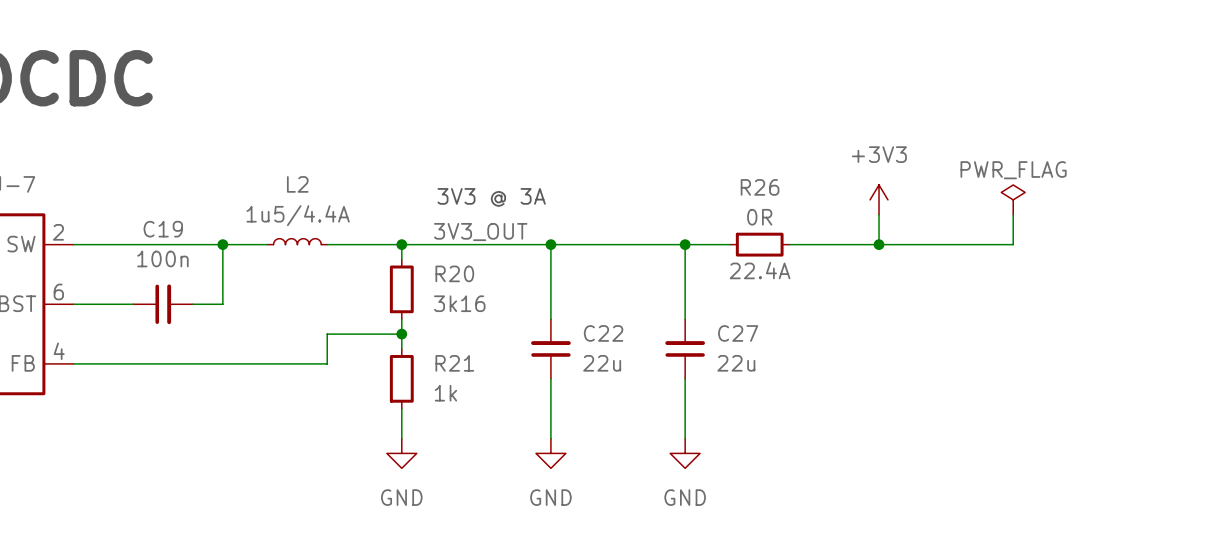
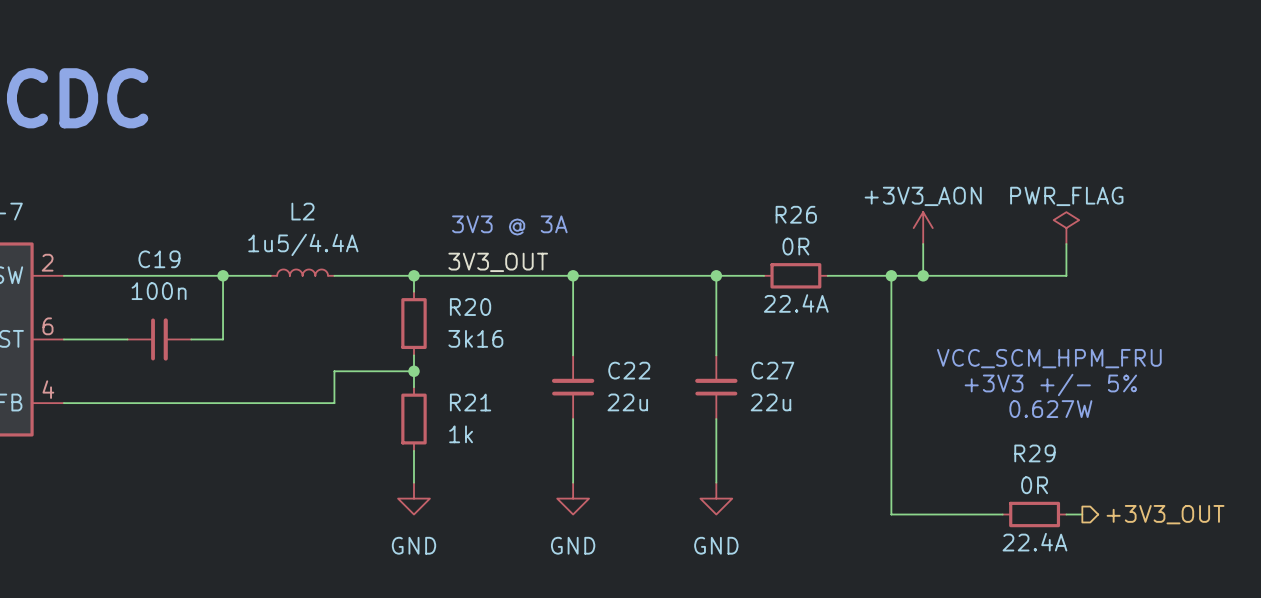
power symbol: +3V3 (879, 199) -> +3V3_AON (923, 228)
wire: none -> (891, 275) (891, 514) (1002, 514)
junction: none -> (891, 275)
text: none -> VCC_SCM_HPM_FRU (1049, 358)
text: none -> +3V3 +/- 5% (1050, 384)
text: none -> 0.627W (1050, 409)
R29: none -> (1034, 514)
wire: none -> (1066, 514) (1082, 514)
hierarchical label: none -> +3V3_OUT (1165, 514)

